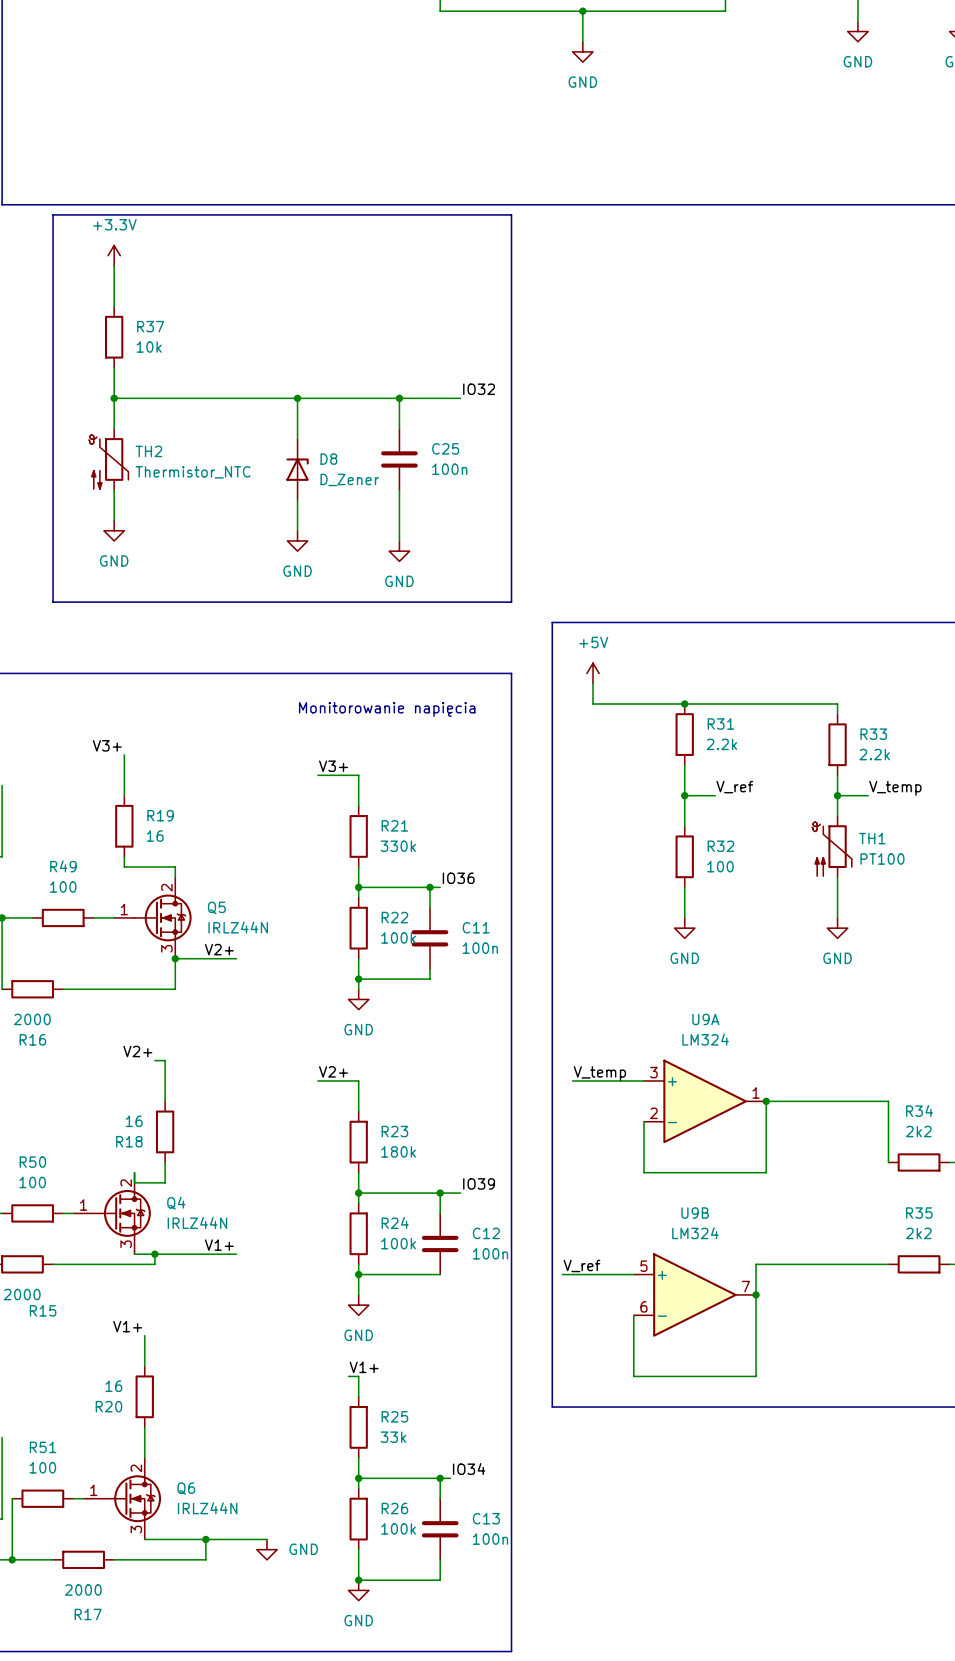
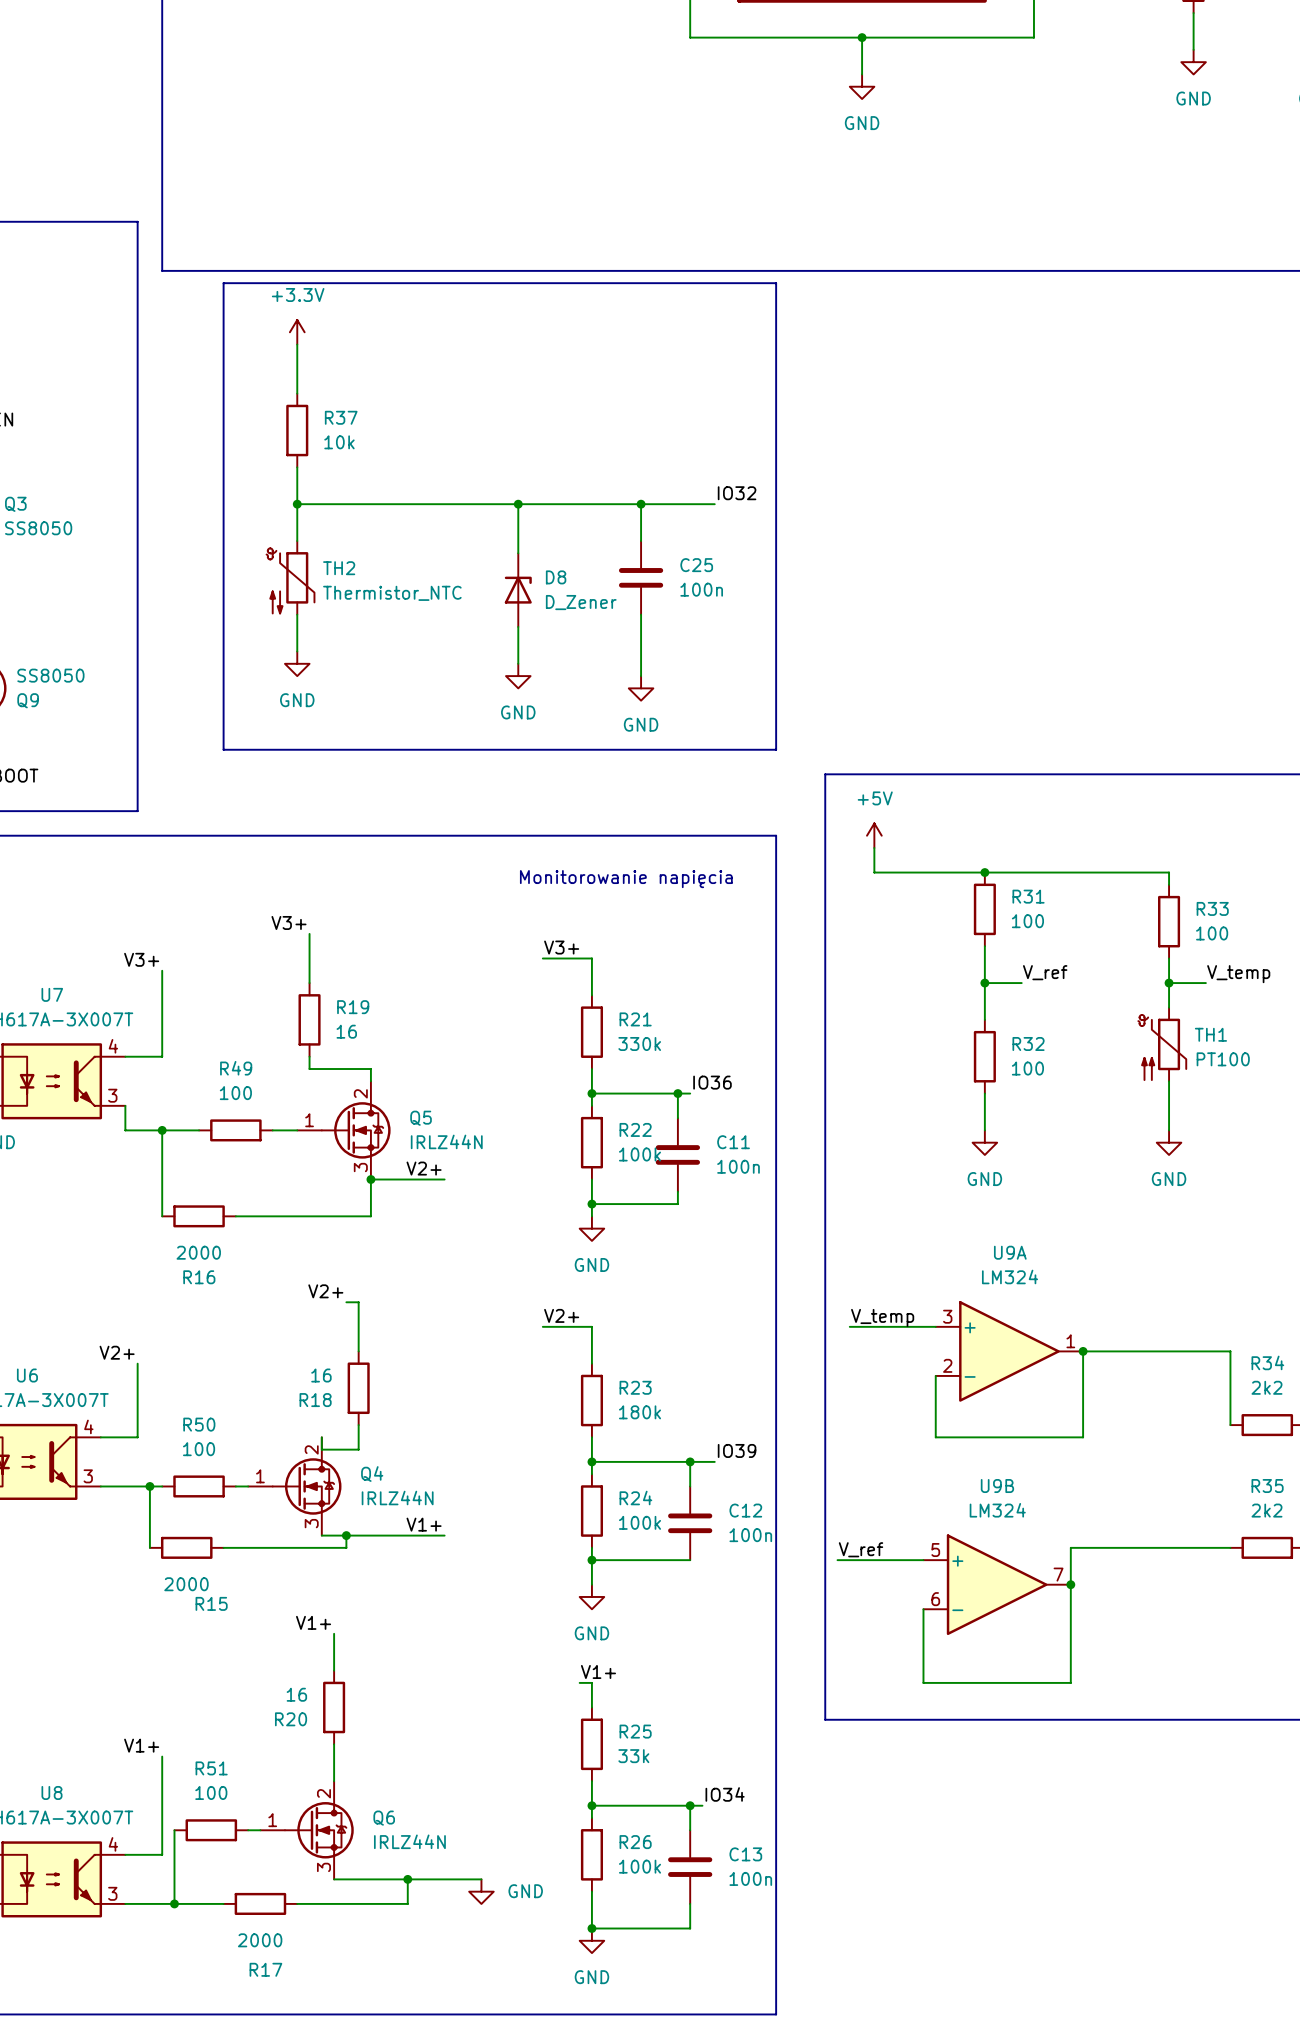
R31 value: 2.2k (721, 744) -> 100 (1027, 921)
R33 value: 2.2k (874, 754) -> 100 (1212, 933)

